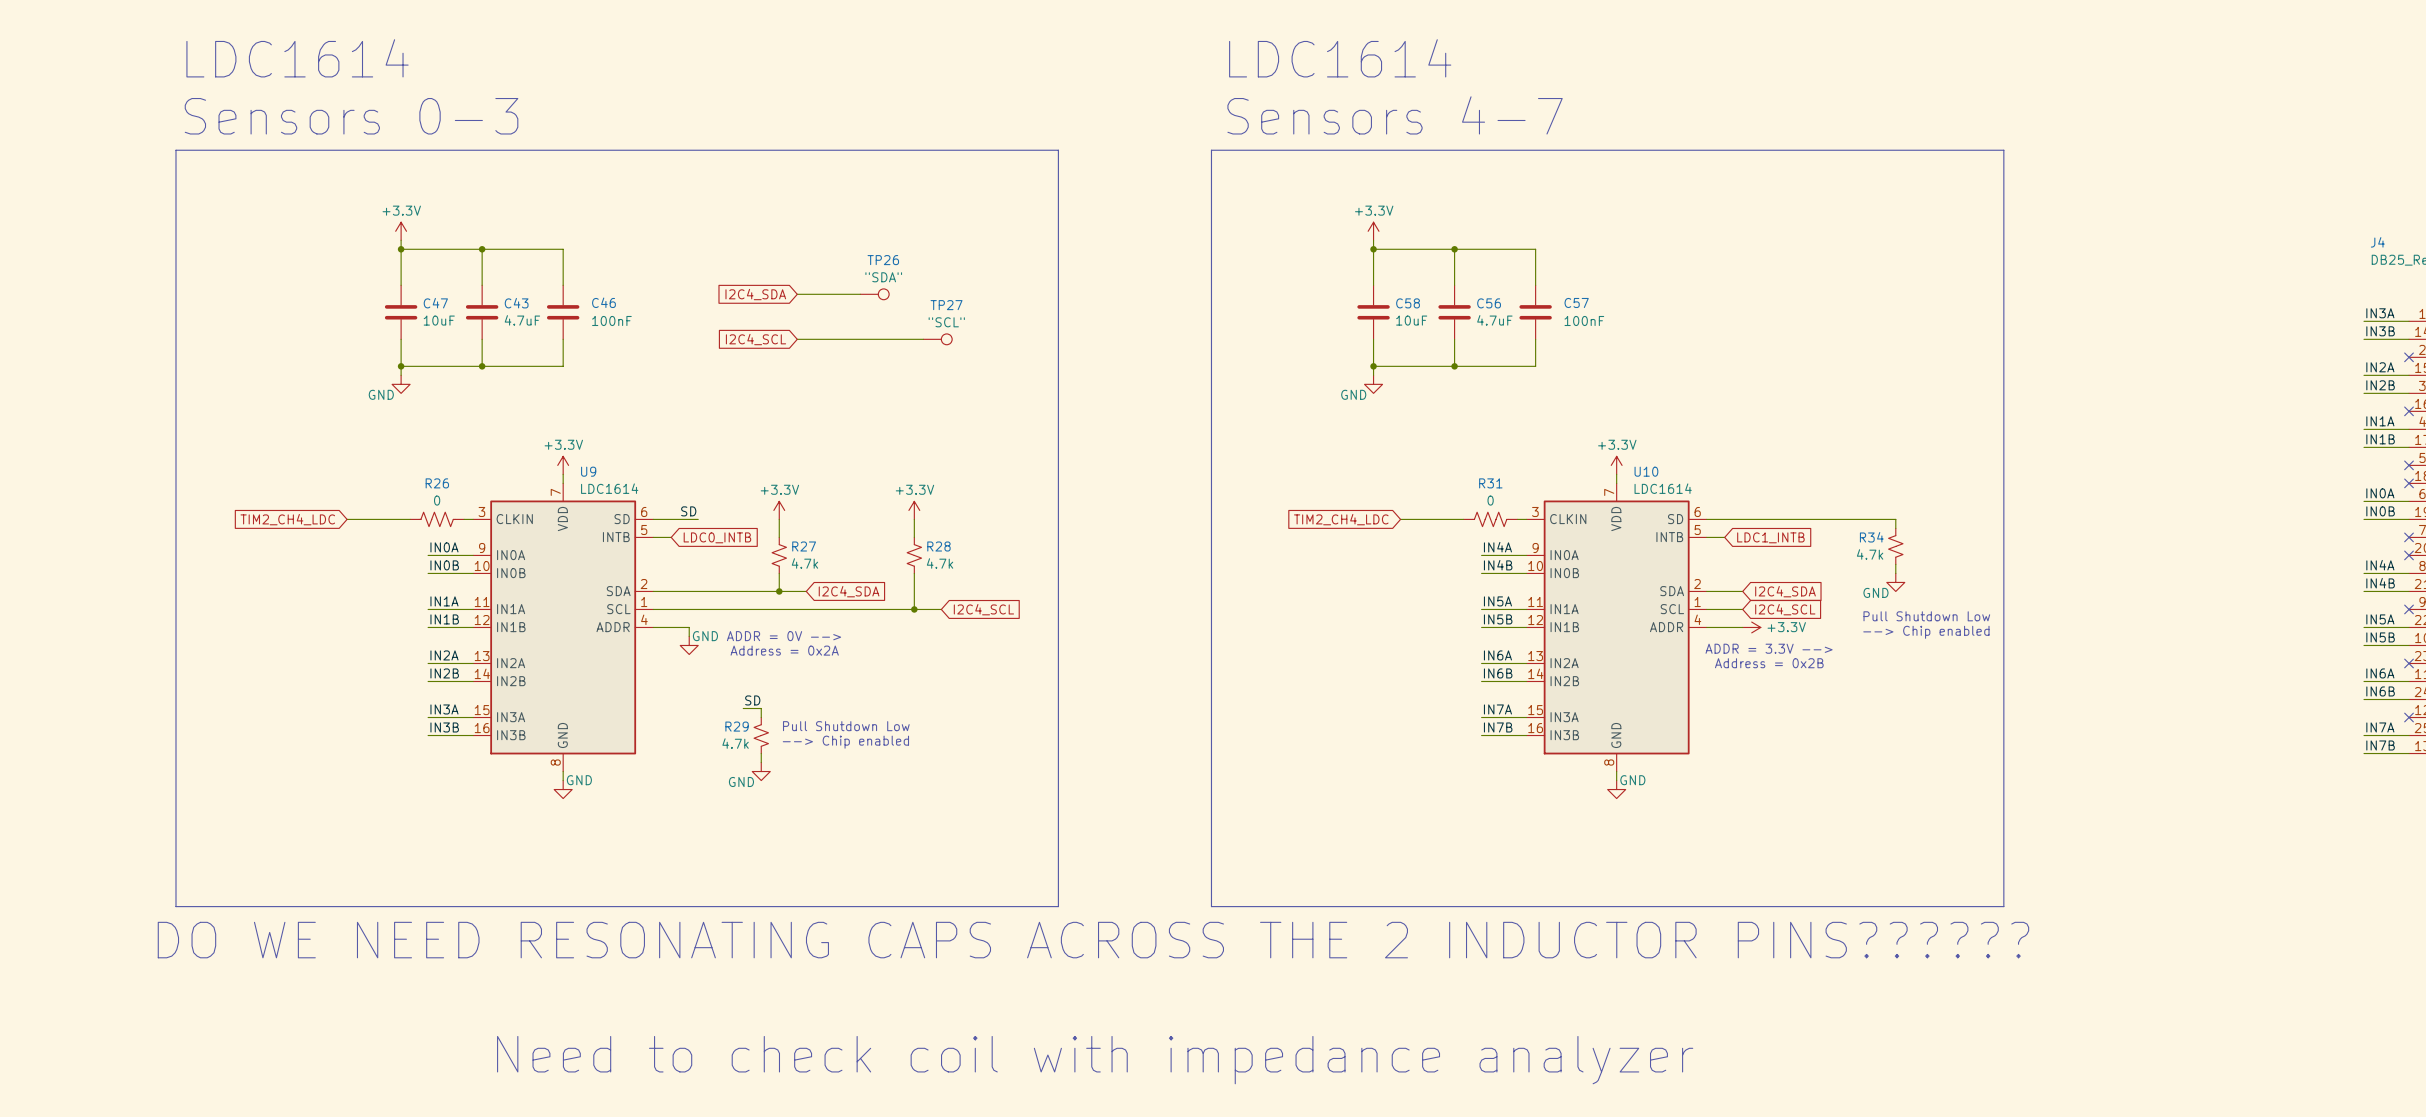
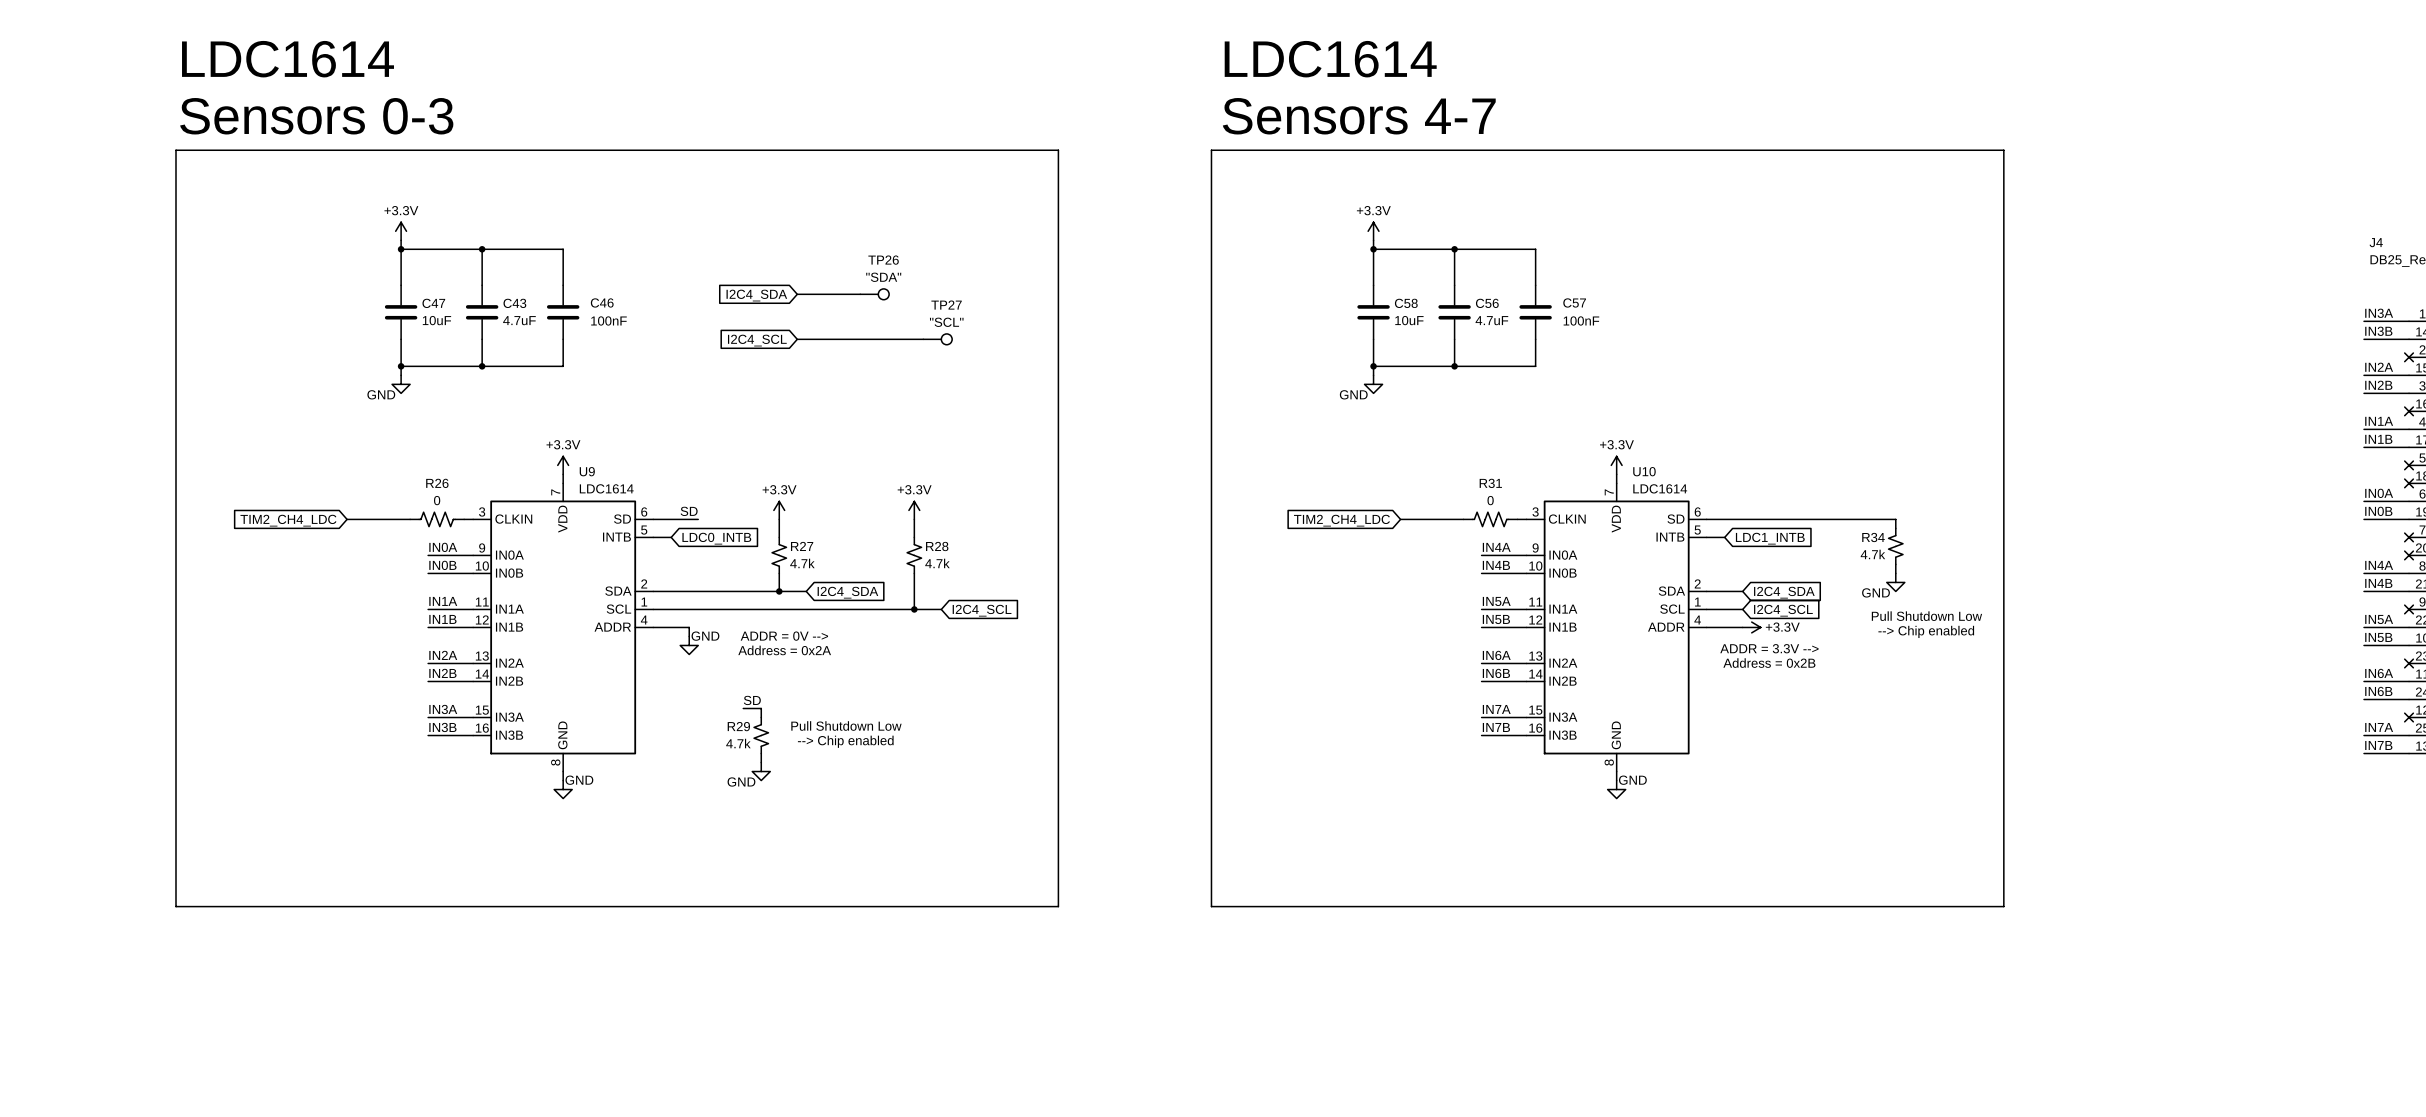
text: DO WE NEED RESONATING CAPS ACROSS THE 2 INDUCTOR PINS?????? (1093, 940) -> none
text: Need to check coil with impedance analyzer (1095, 1060) -> none

